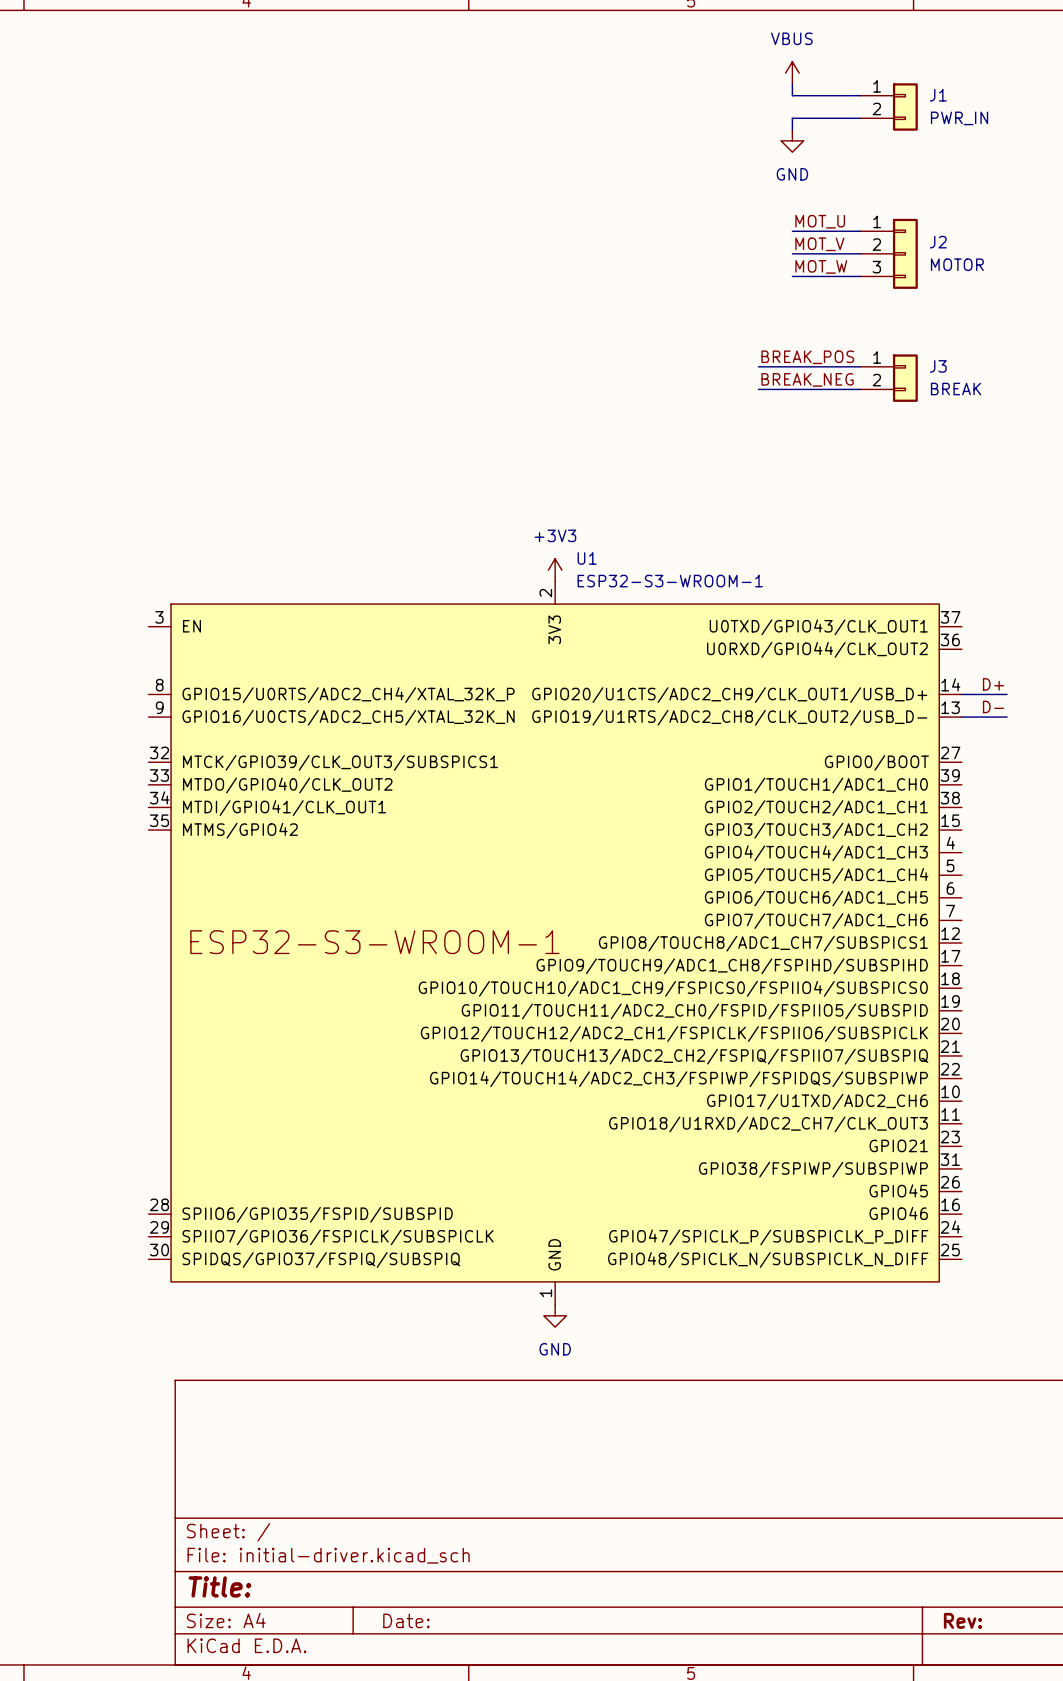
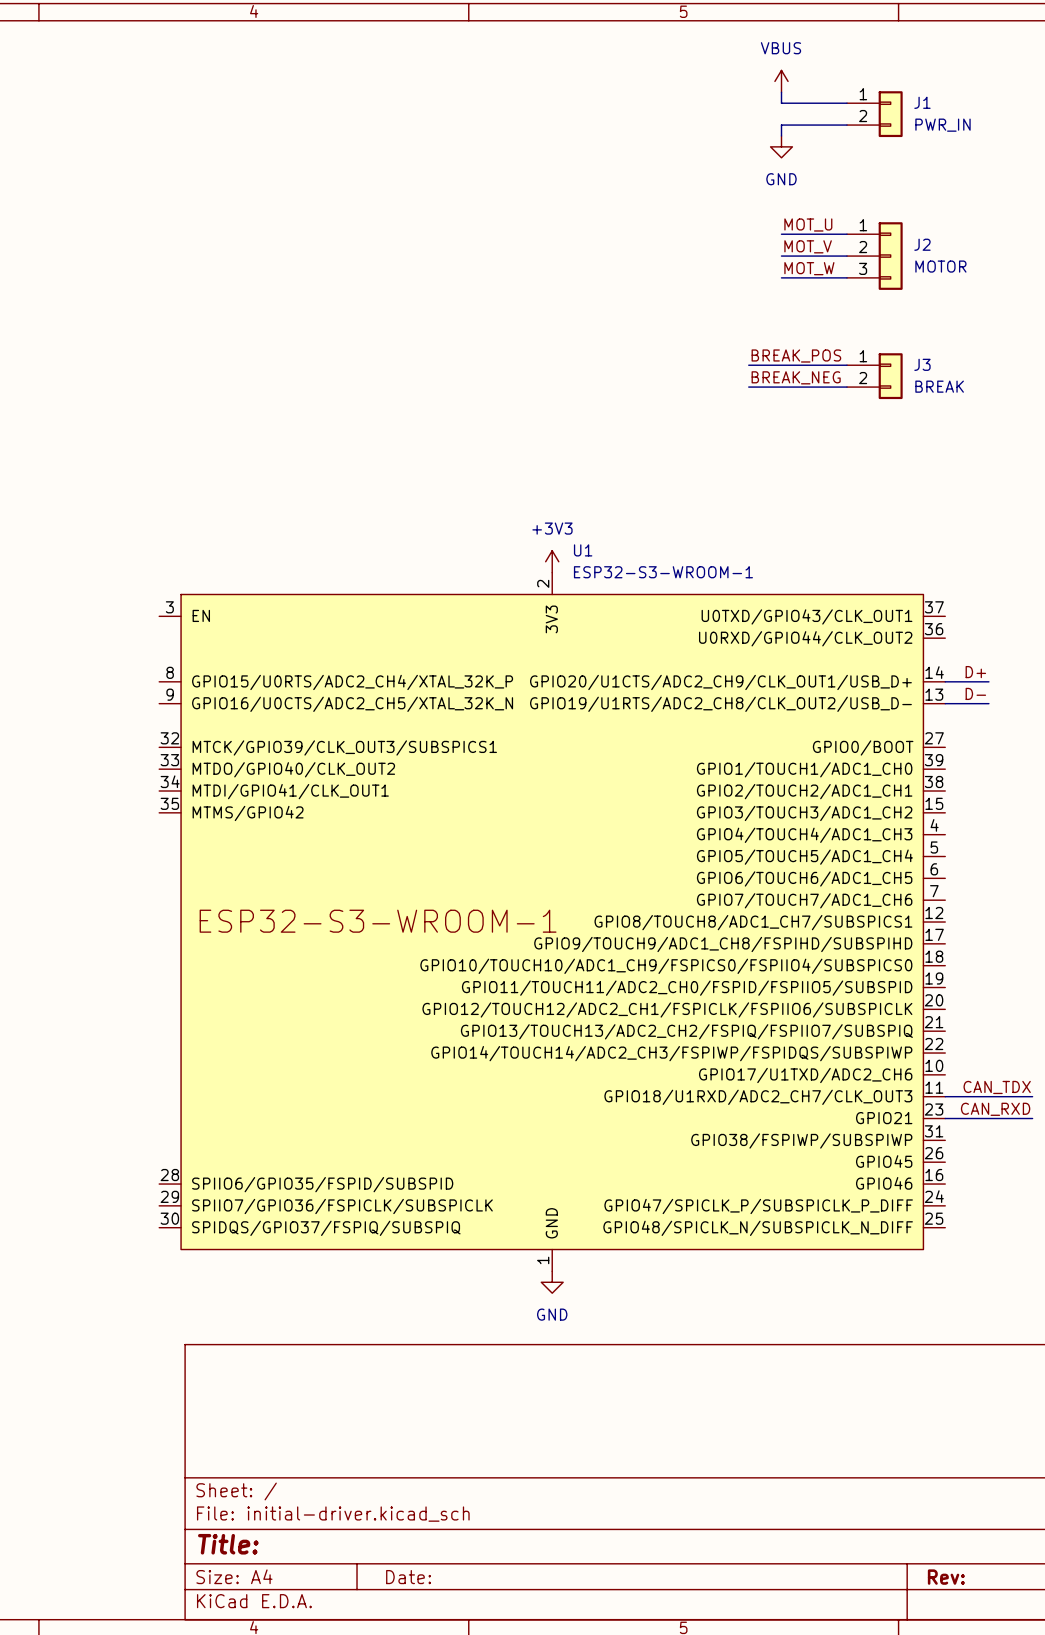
label: none -> CAN_TDX (997, 1087)
wire: none -> (945, 1096) (1032, 1096)
label: none -> CAN_RXD (995, 1109)
wire: none -> (945, 1118) (1032, 1118)

